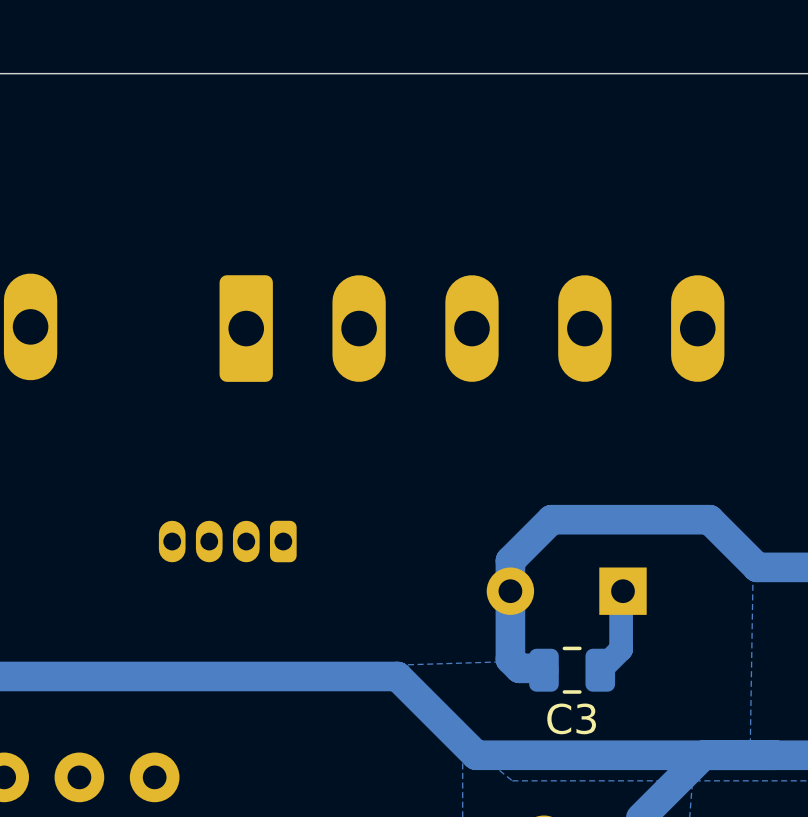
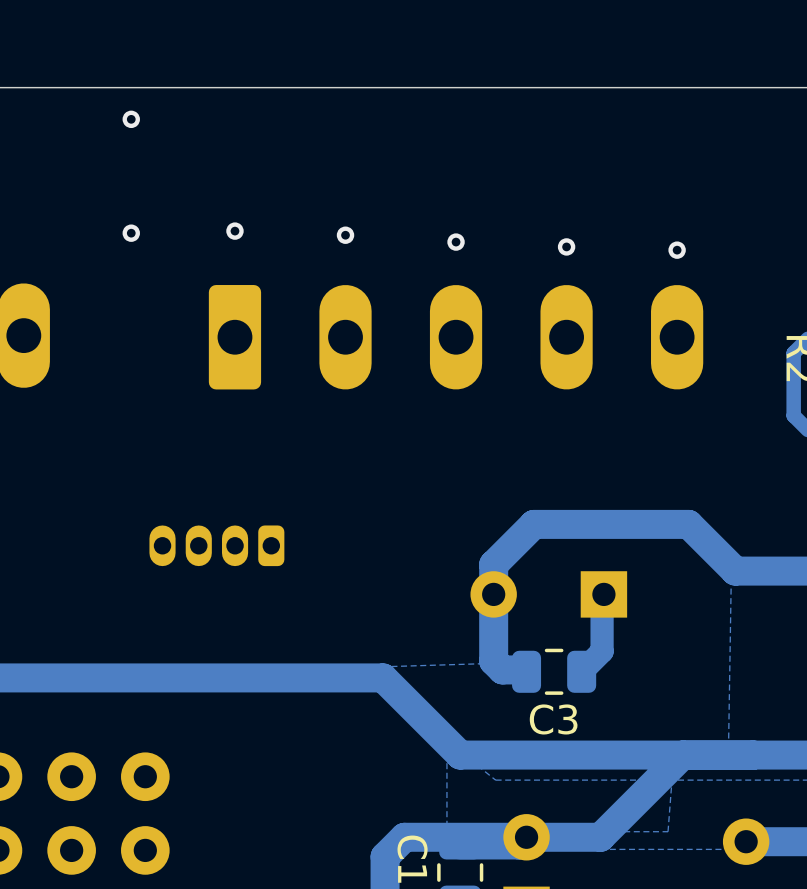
via: none -> (131, 119)
via: none -> (234, 231)
via: none -> (131, 233)
via: none -> (345, 235)
via: none -> (456, 242)
via: none -> (566, 246)
via: none -> (677, 250)

